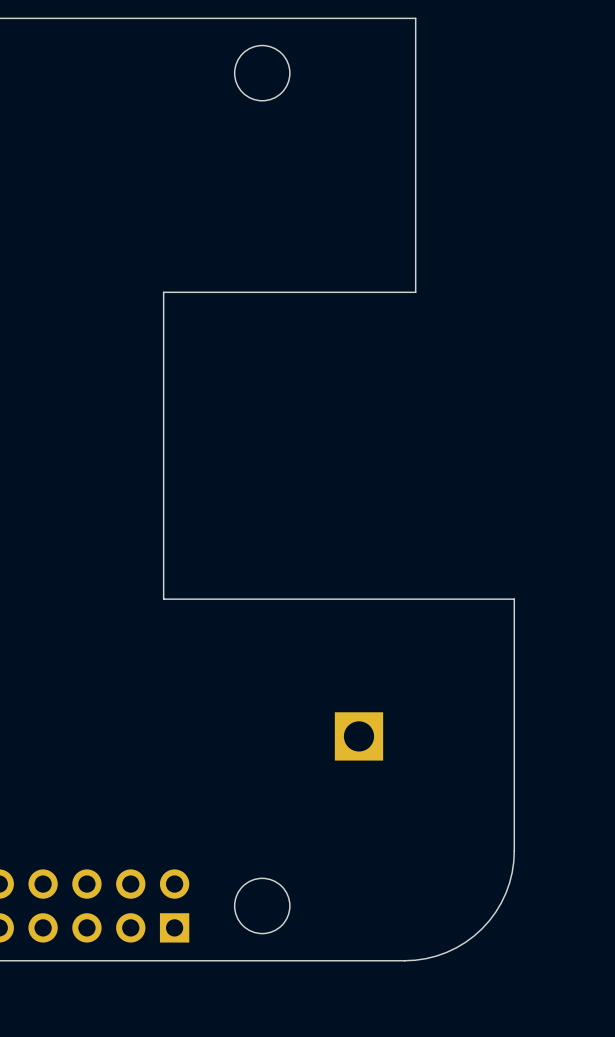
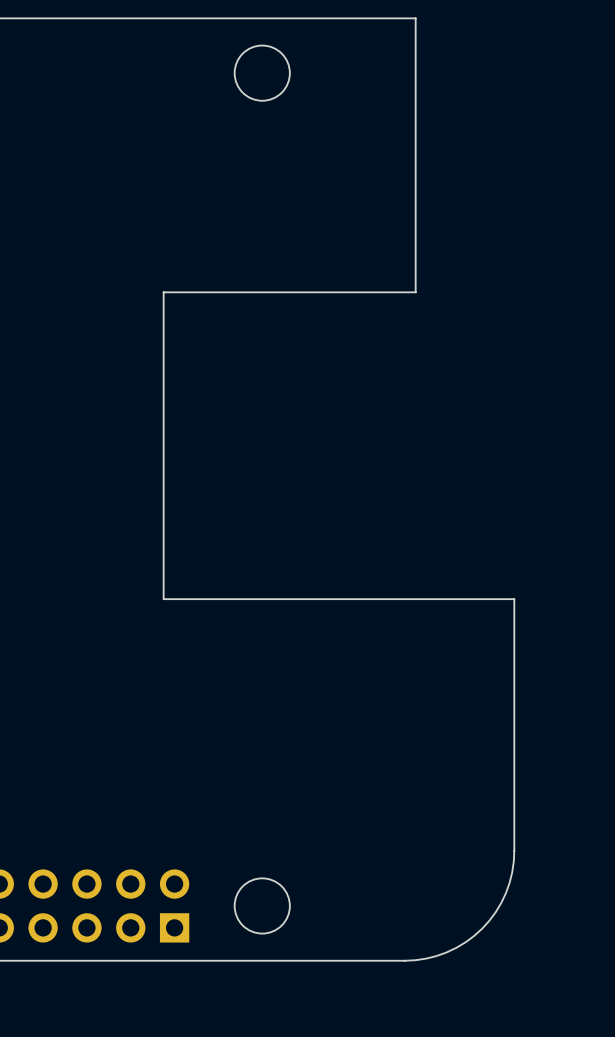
part: (358, 736) -> none

